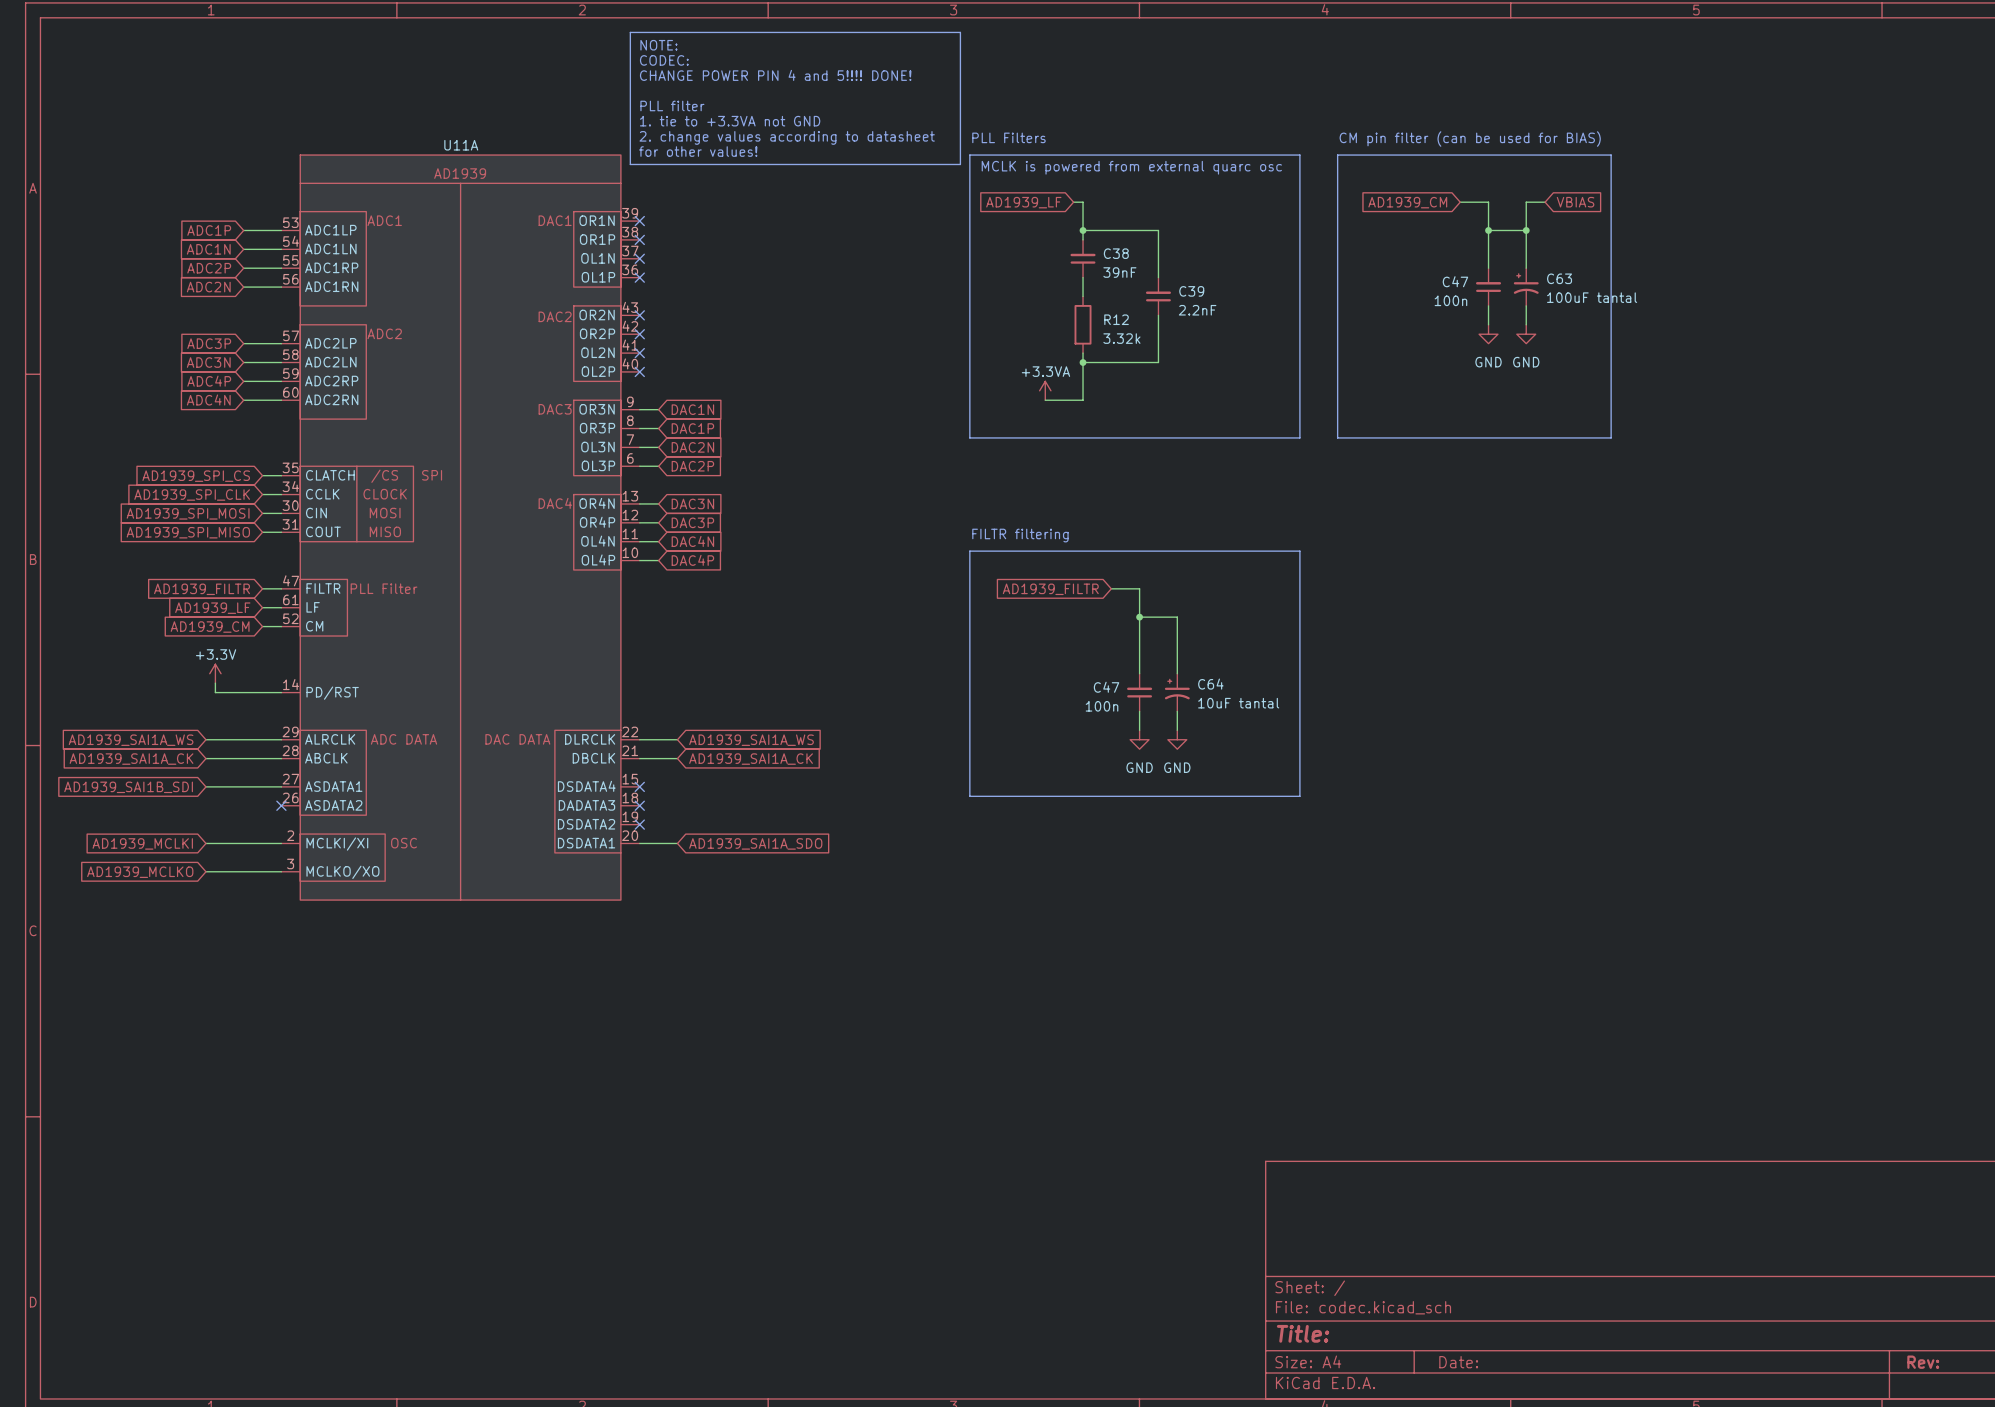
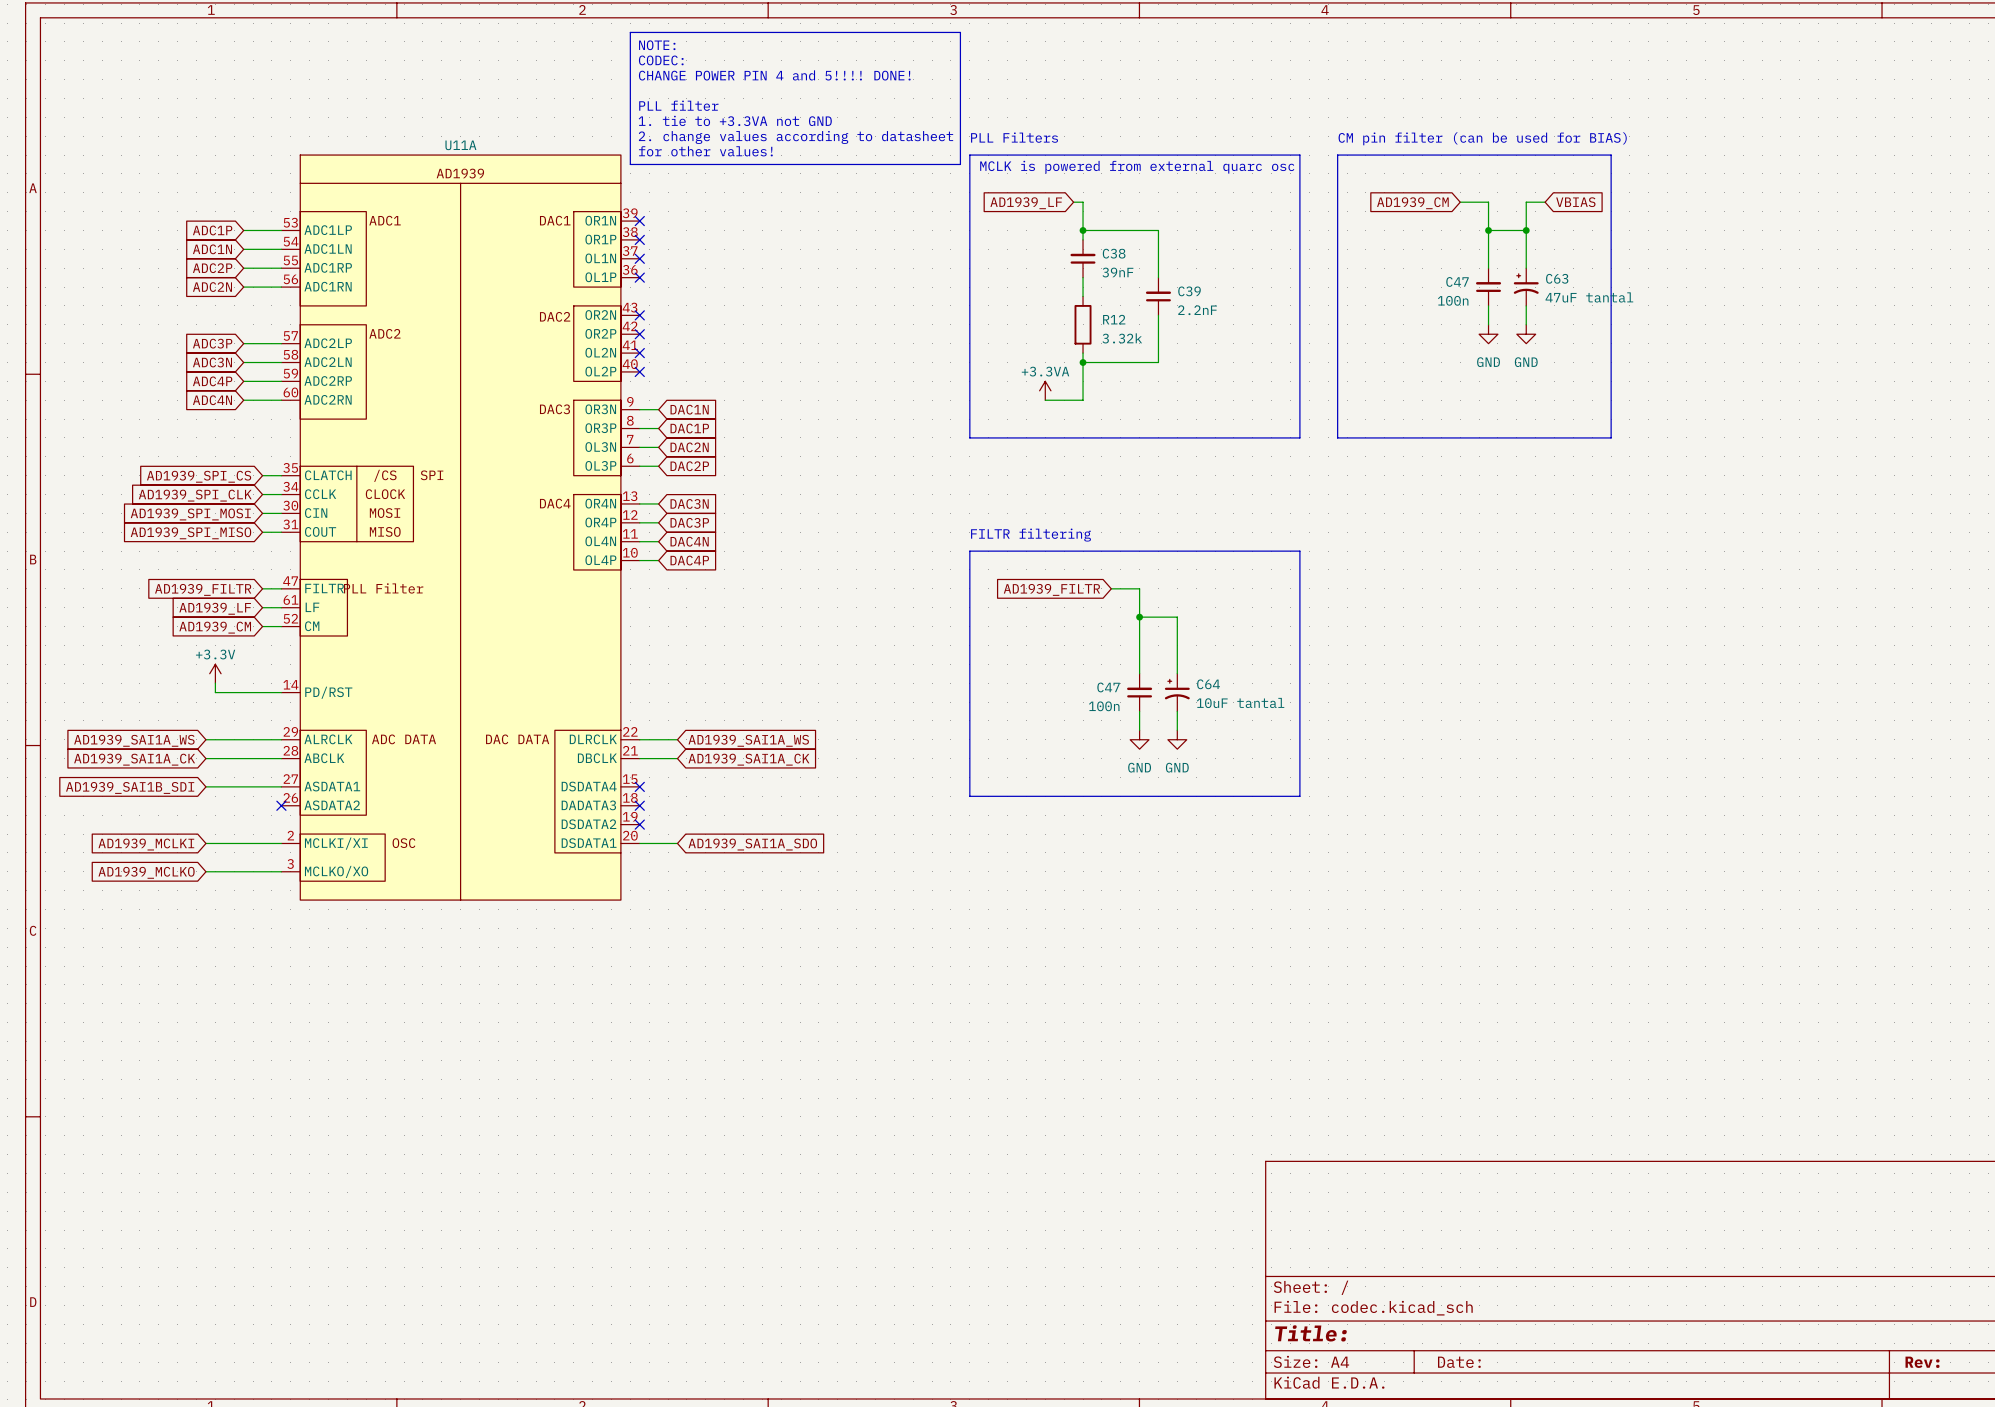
C63 value: 100uF tantal (1592, 297) -> 47uF tantal (1589, 297)

